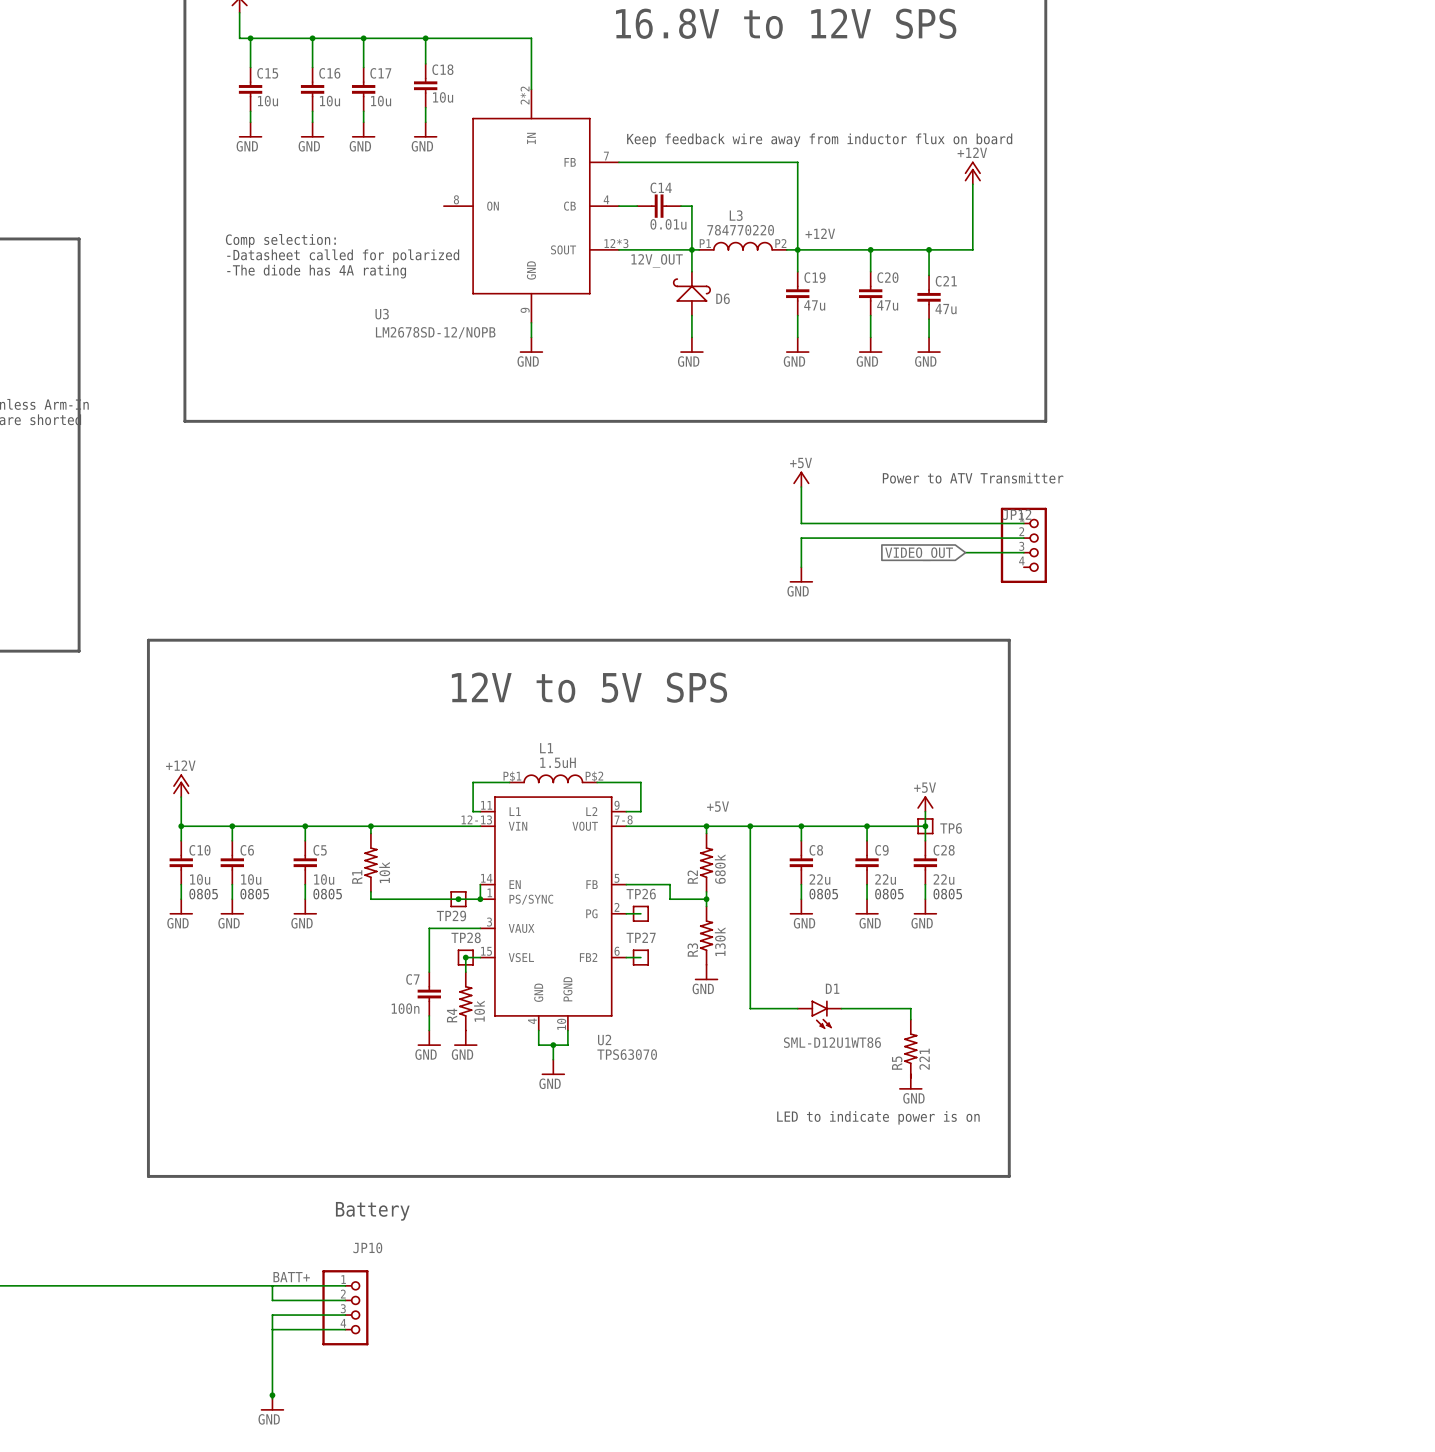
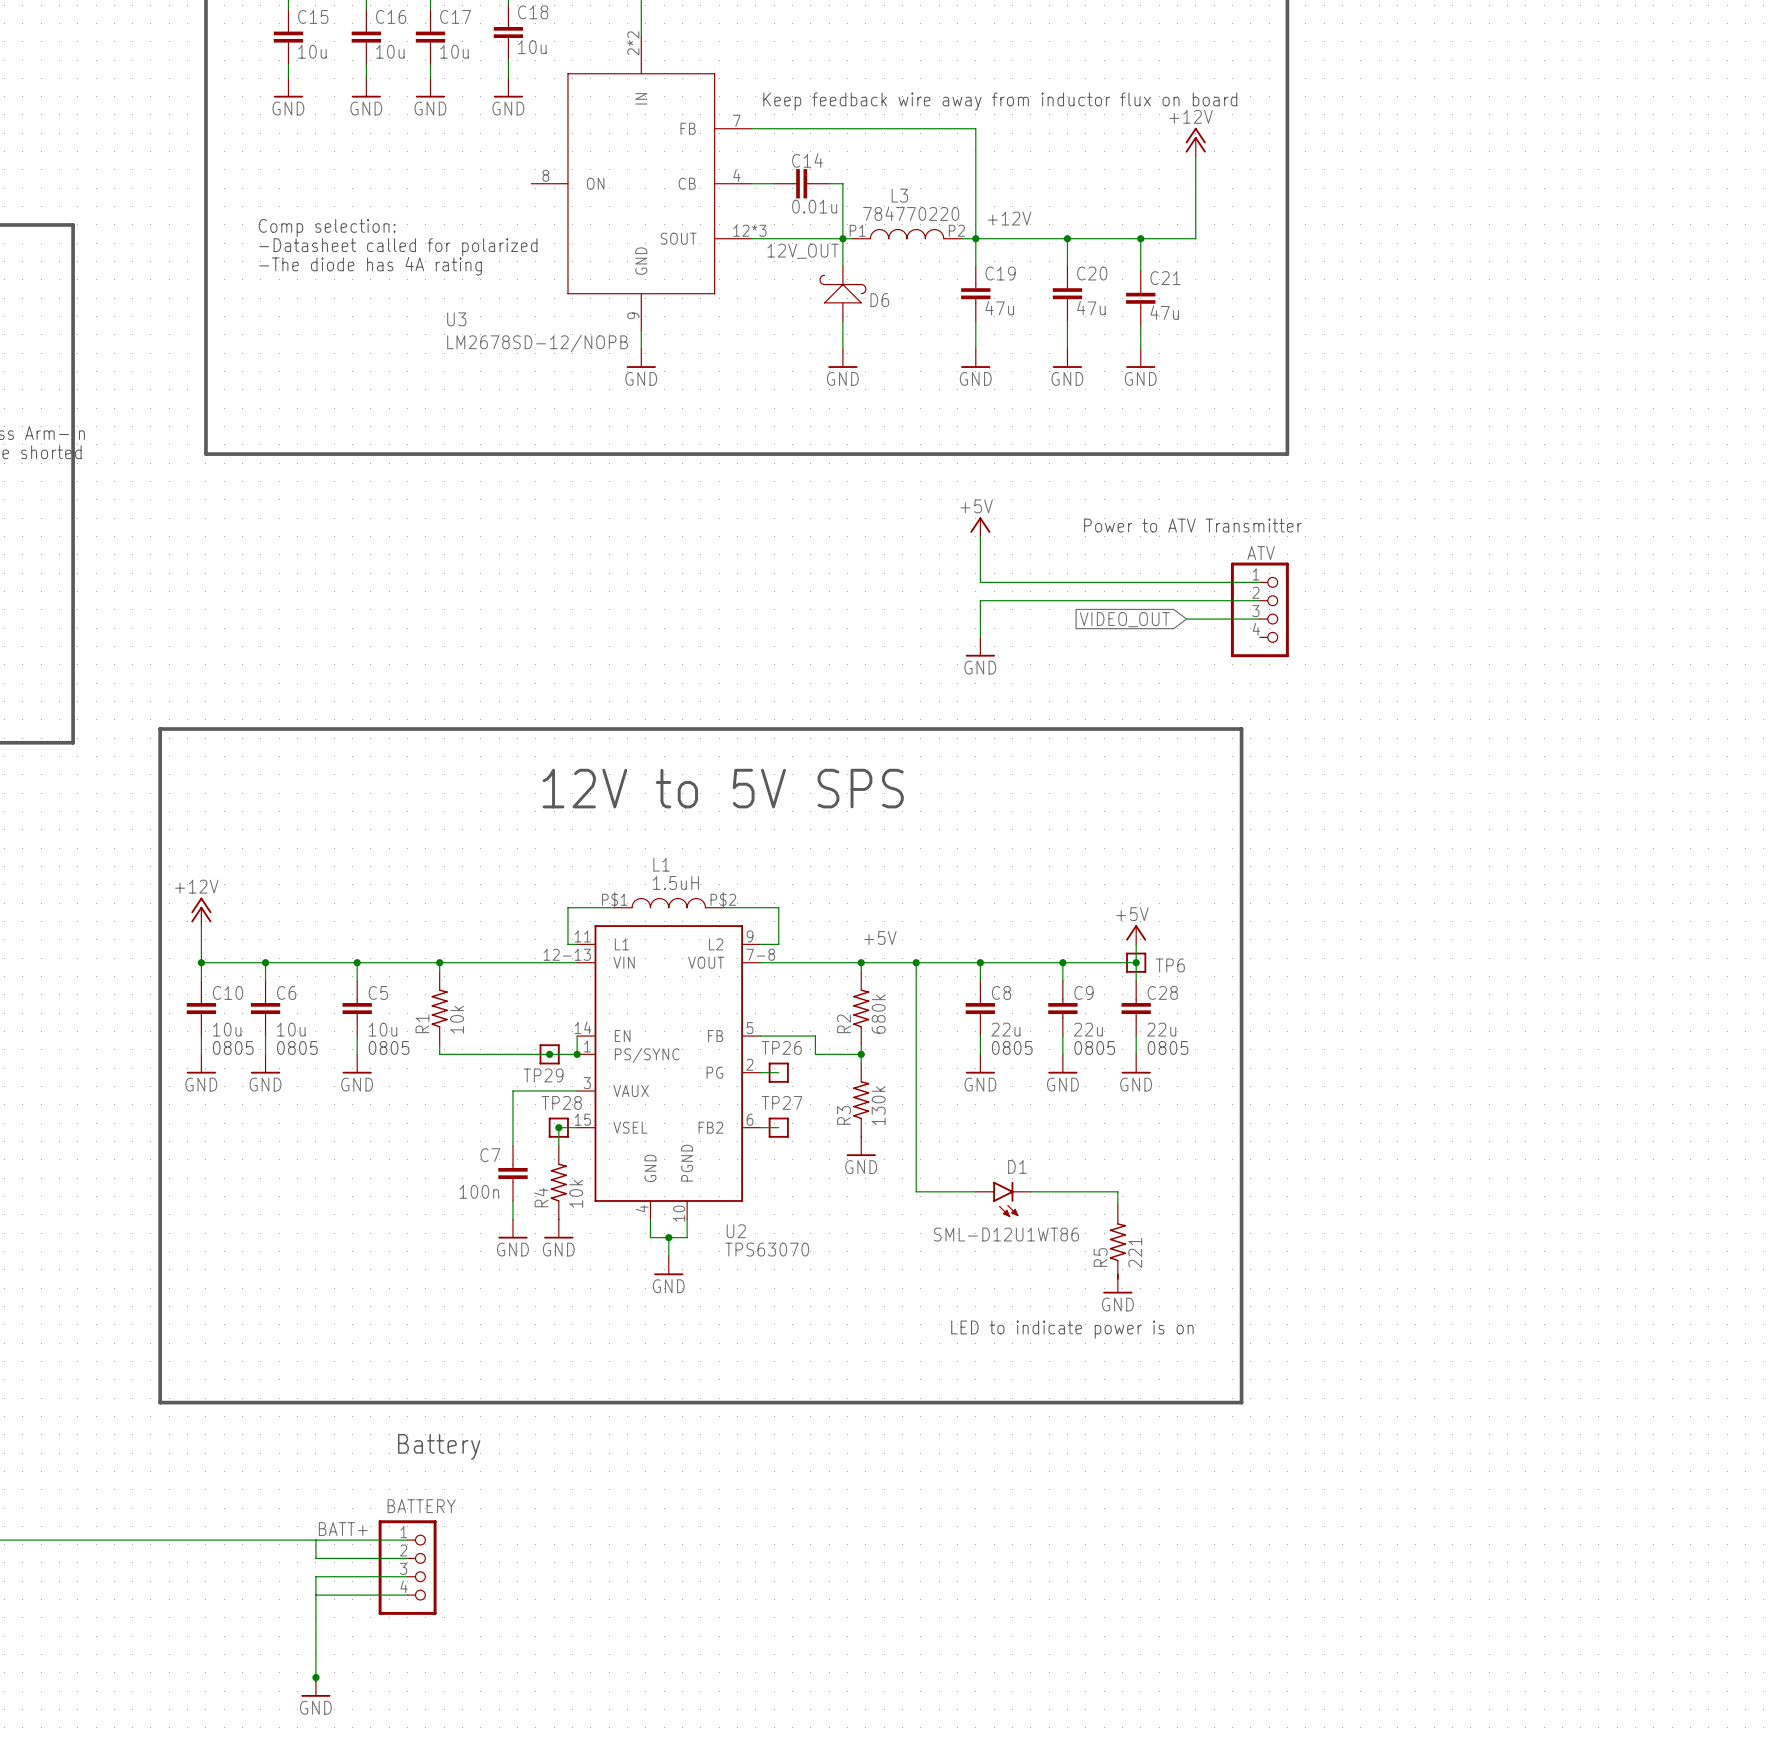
JP12 name: JP12 (1016, 514) -> ATV (1261, 553)
JP10 name: JP10 (367, 1247) -> BATTERY (421, 1506)

